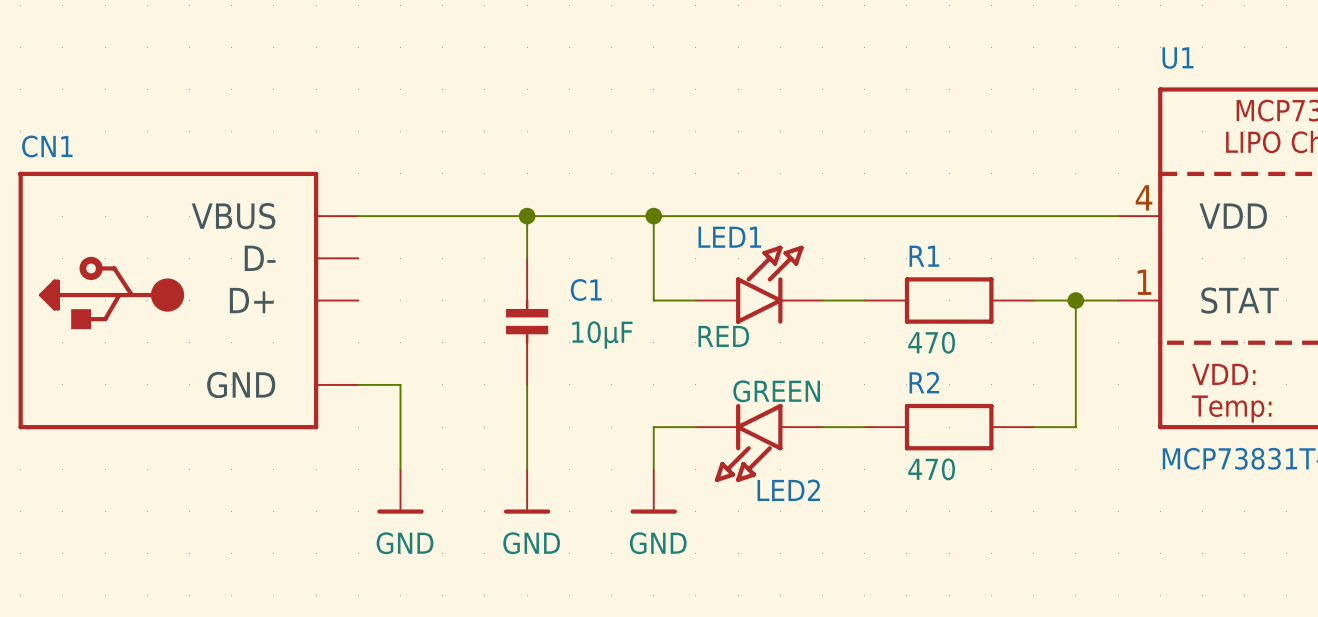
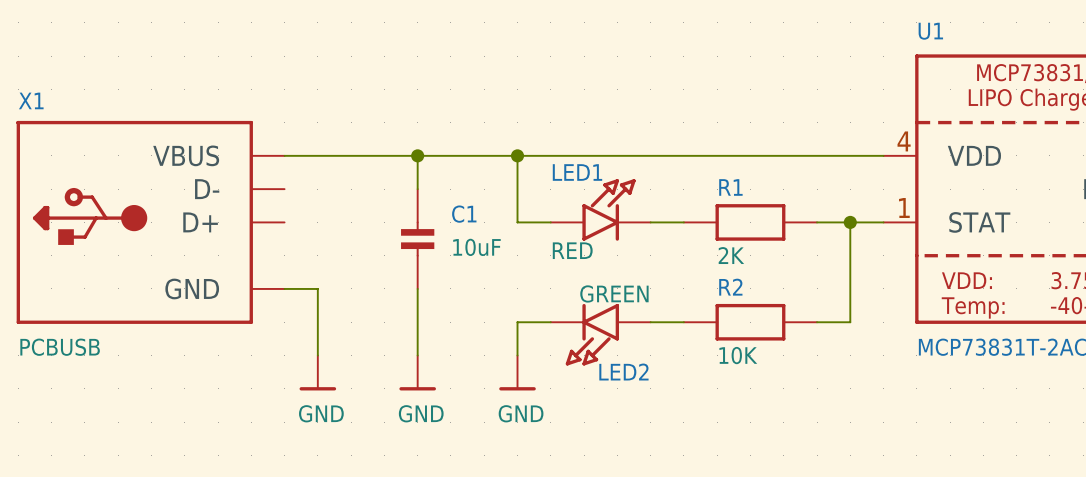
CN1 name: CN1 (47, 146) -> X1 (31, 100)
C1 value: 10µF (602, 335) -> 10uF (476, 247)
R1 value: 470 (931, 342) -> 2K (731, 255)
CN1 value: none -> PCBUSB (60, 347)
R2 value: 470 (931, 469) -> 10K (738, 355)

